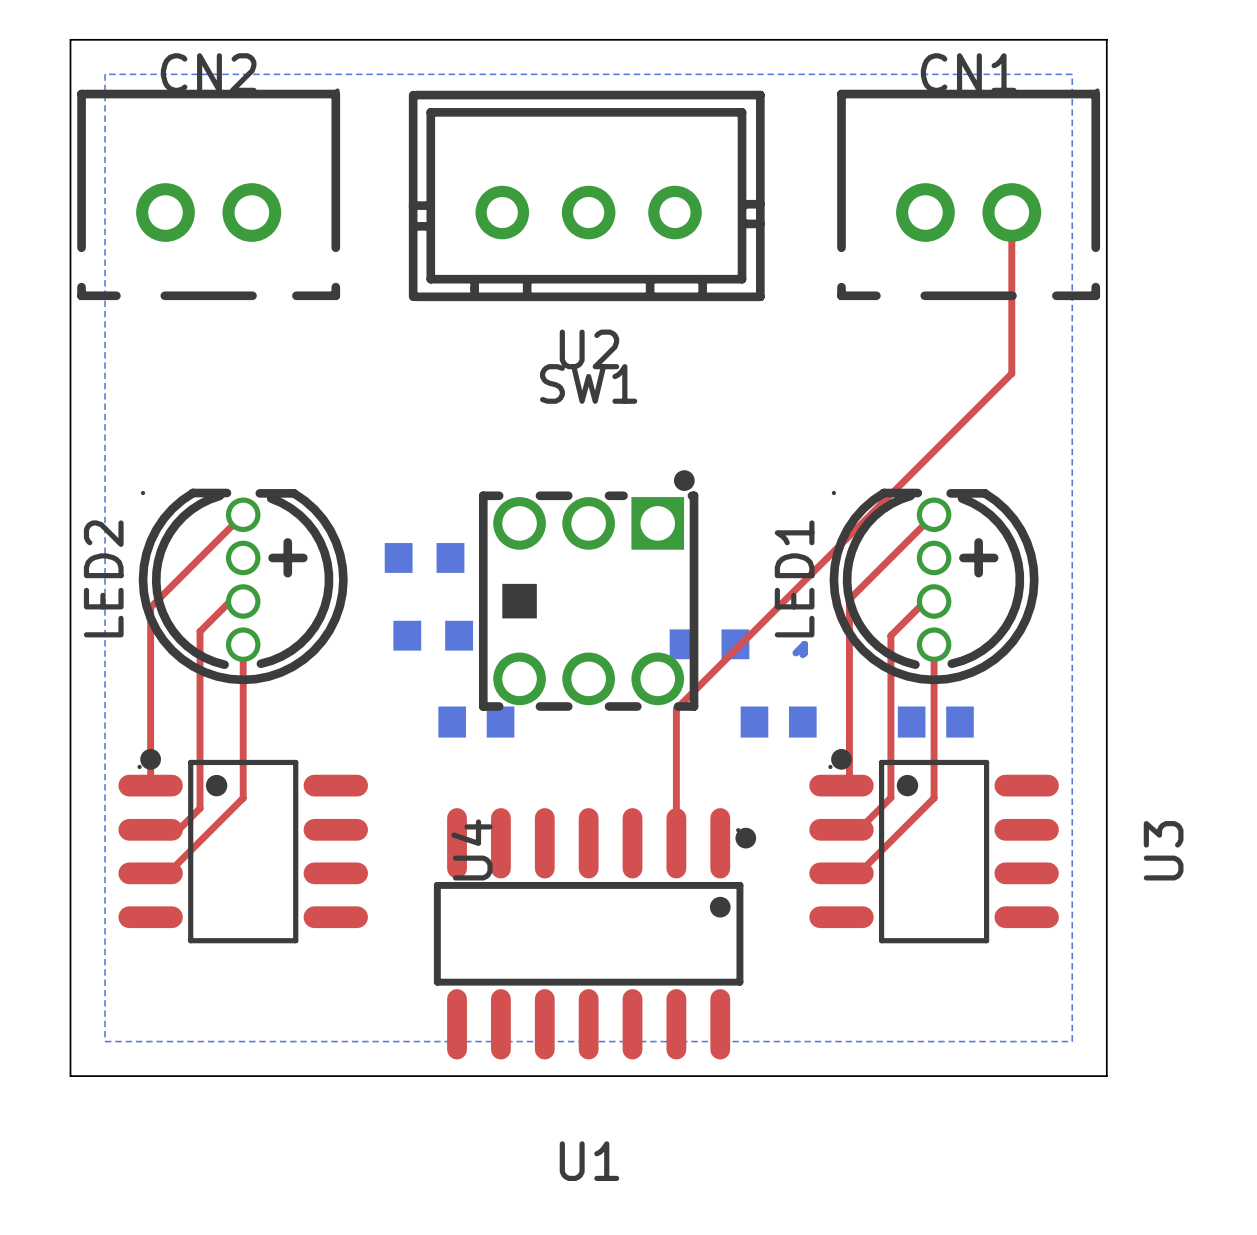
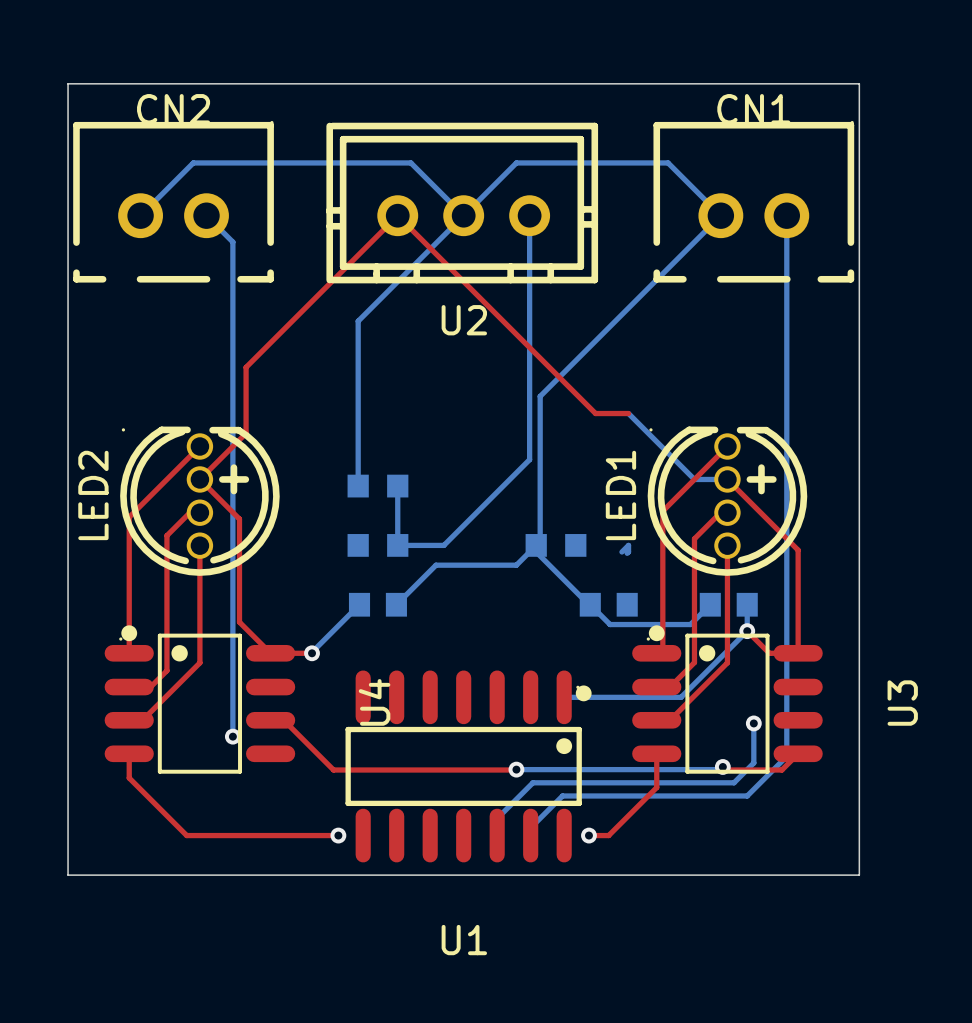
bottom zone outline: (105, 74) (1072, 74) (1072, 1041) (105, 1041) (105, 74) -> none
bottom track: none -> (140, 215) (193, 162) (410, 162) (463, 215)
bottom track: none -> (206, 215) (232, 242) (232, 736)
bottom track: none -> (529, 215) (529, 459) (443, 545) (397, 545) (397, 486)
top track: (1011, 212) (1011, 373) (676, 708) (676, 843) -> none
bottom track: none -> (786, 215) (786, 756) (747, 795) (562, 795) (530, 827) (530, 835)
top track: none -> (628, 413) (595, 413) (397, 215) (246, 367) (246, 433) (199, 479) (239, 519) (239, 622) (270, 653) (312, 653)
bottom track: none -> (628, 413) (694, 479) (727, 479)
part: (424, 557) -> none
top track: none -> (727, 479) (798, 550) (798, 653) (769, 653) (747, 631)
bottom track: none -> (358, 486) (358, 321) (516, 162) (668, 162) (720, 215) (540, 396) (540, 541) (516, 565) (435, 565) (396, 604)
part: none -> (377, 486)
SW1: (588, 590) -> none
part: (433, 635) -> none
part: none -> (377, 545)
bottom track: none -> (536, 552) (610, 624) (690, 624) (710, 604)
bottom track: none -> (359, 604) (312, 653)
bottom track: none -> (747, 604) (747, 631) (681, 697) (564, 697)
via: none -> (747, 631)
via: none -> (312, 653)
top track: none -> (270, 720) (283, 720) (333, 770) (516, 769)
bottom track: none -> (753, 723) (753, 763) (734, 782) (532, 782) (497, 818) (497, 835)
via: none -> (753, 723)
via: none -> (232, 736)
top track: none -> (129, 753) (129, 778) (186, 835) (338, 835)
top track: none -> (656, 753) (656, 787) (608, 835) (588, 835)
top track: none -> (798, 753) (781, 770) (725, 770) (722, 766)
bottom track: none -> (722, 766) (720, 769) (516, 769)
via: none -> (722, 766)
via: none -> (516, 769)
via: none -> (338, 835)
via: none -> (588, 835)

